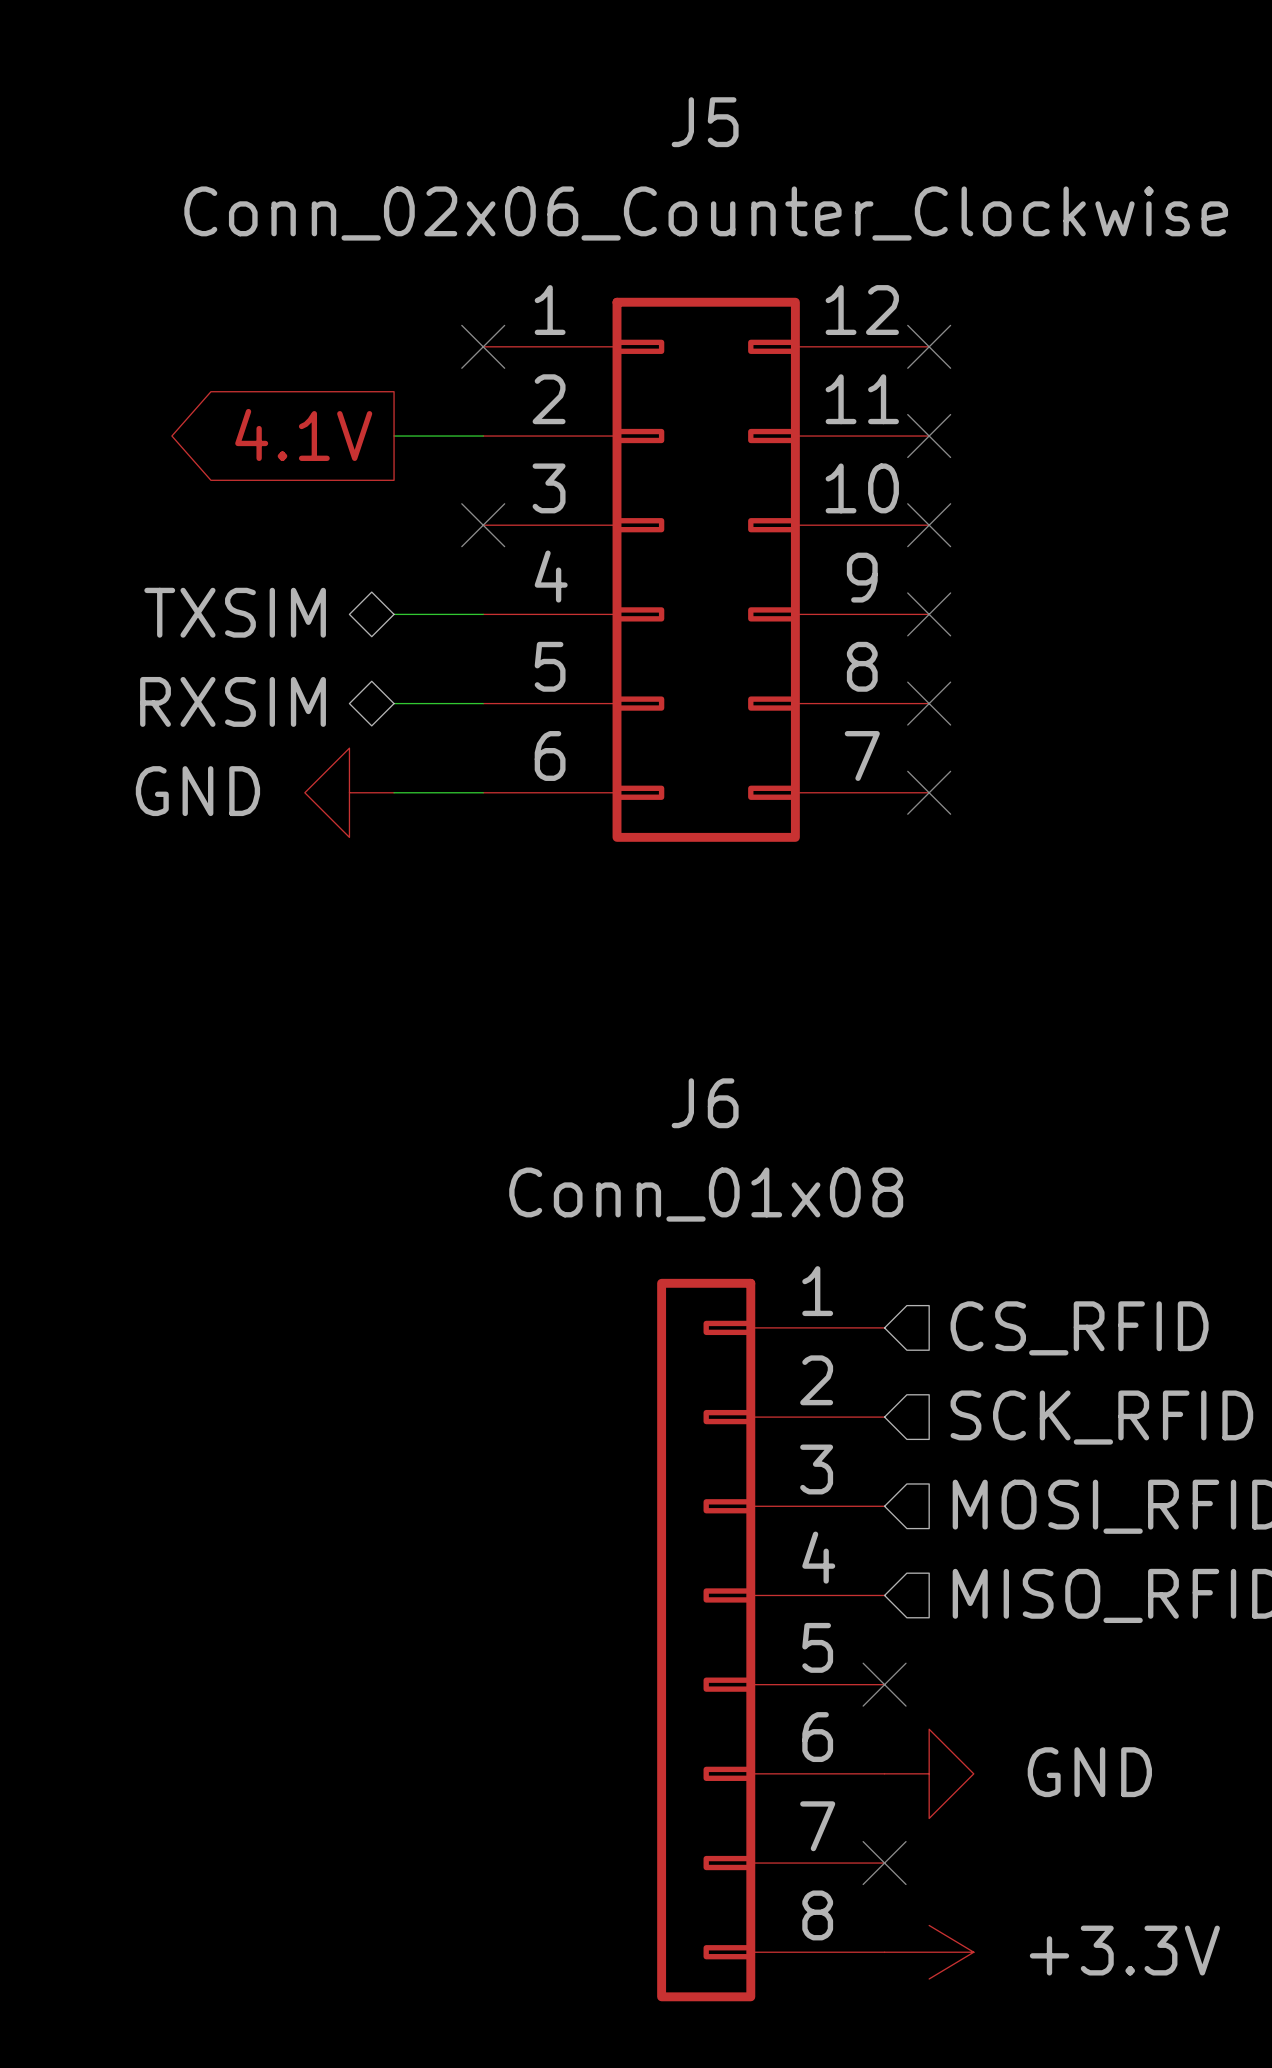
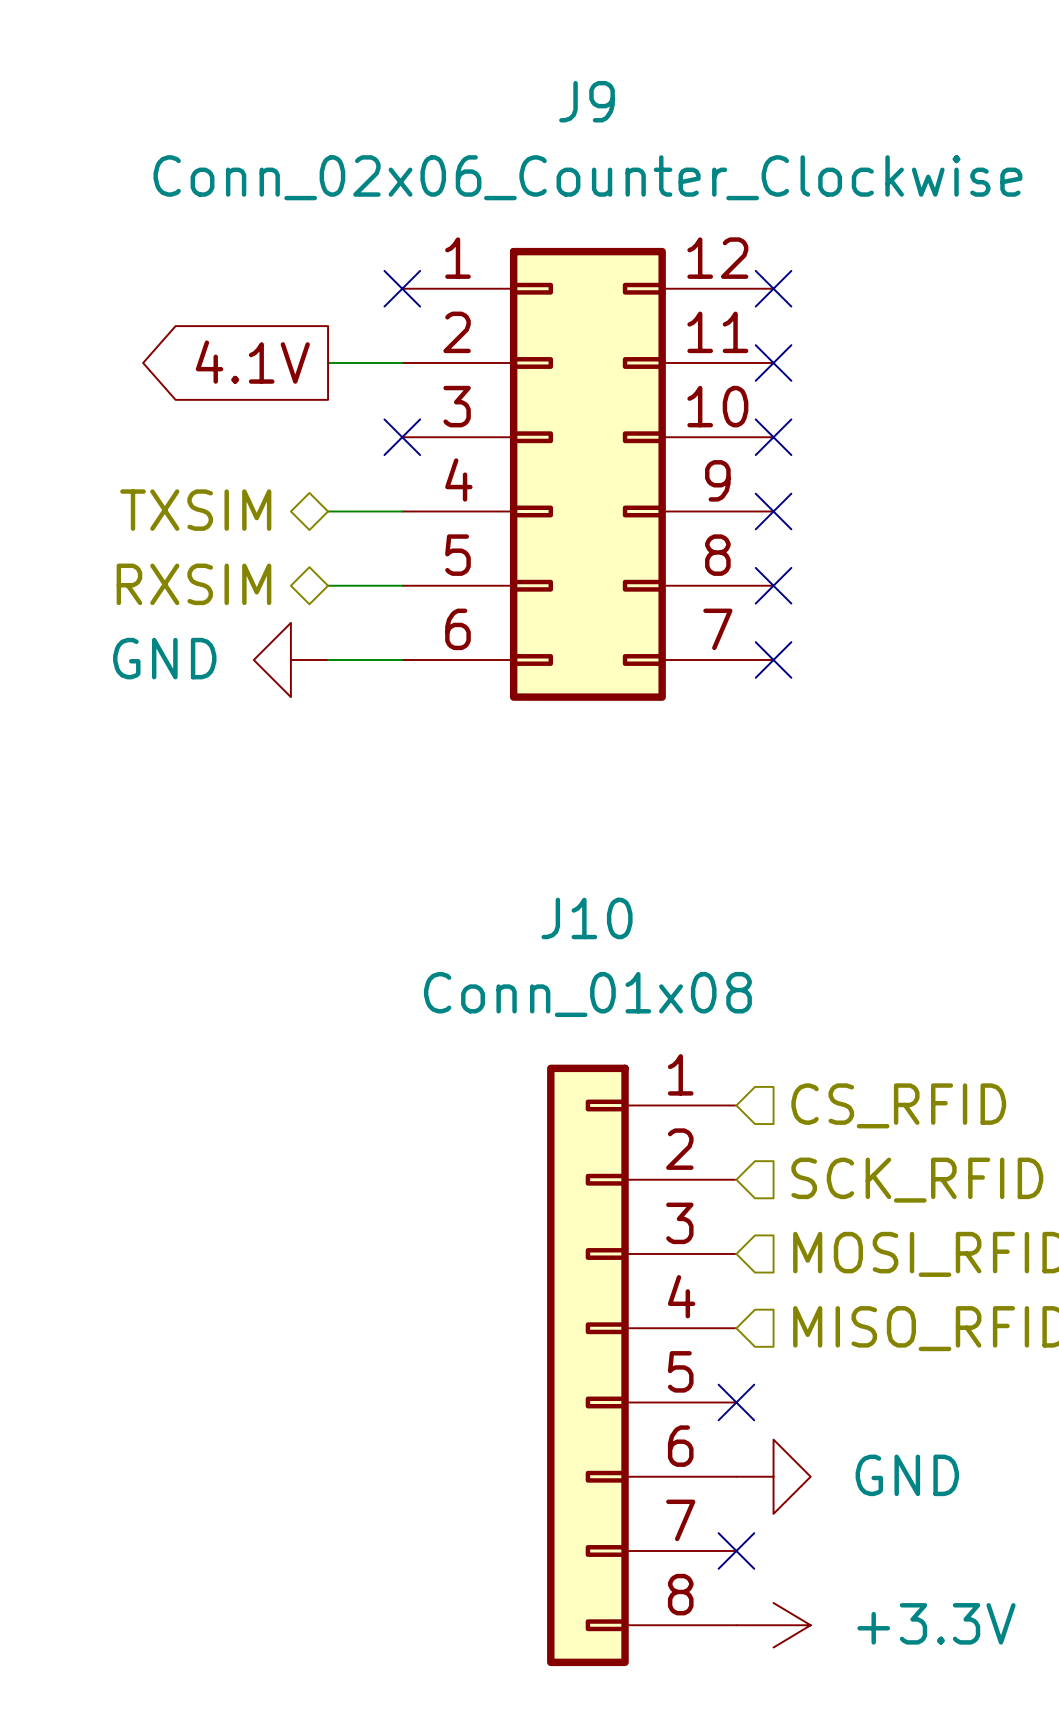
J5 name: J5 (705, 122) -> J9 (587, 101)
J6 name: J6 (705, 1103) -> J10 (587, 918)

